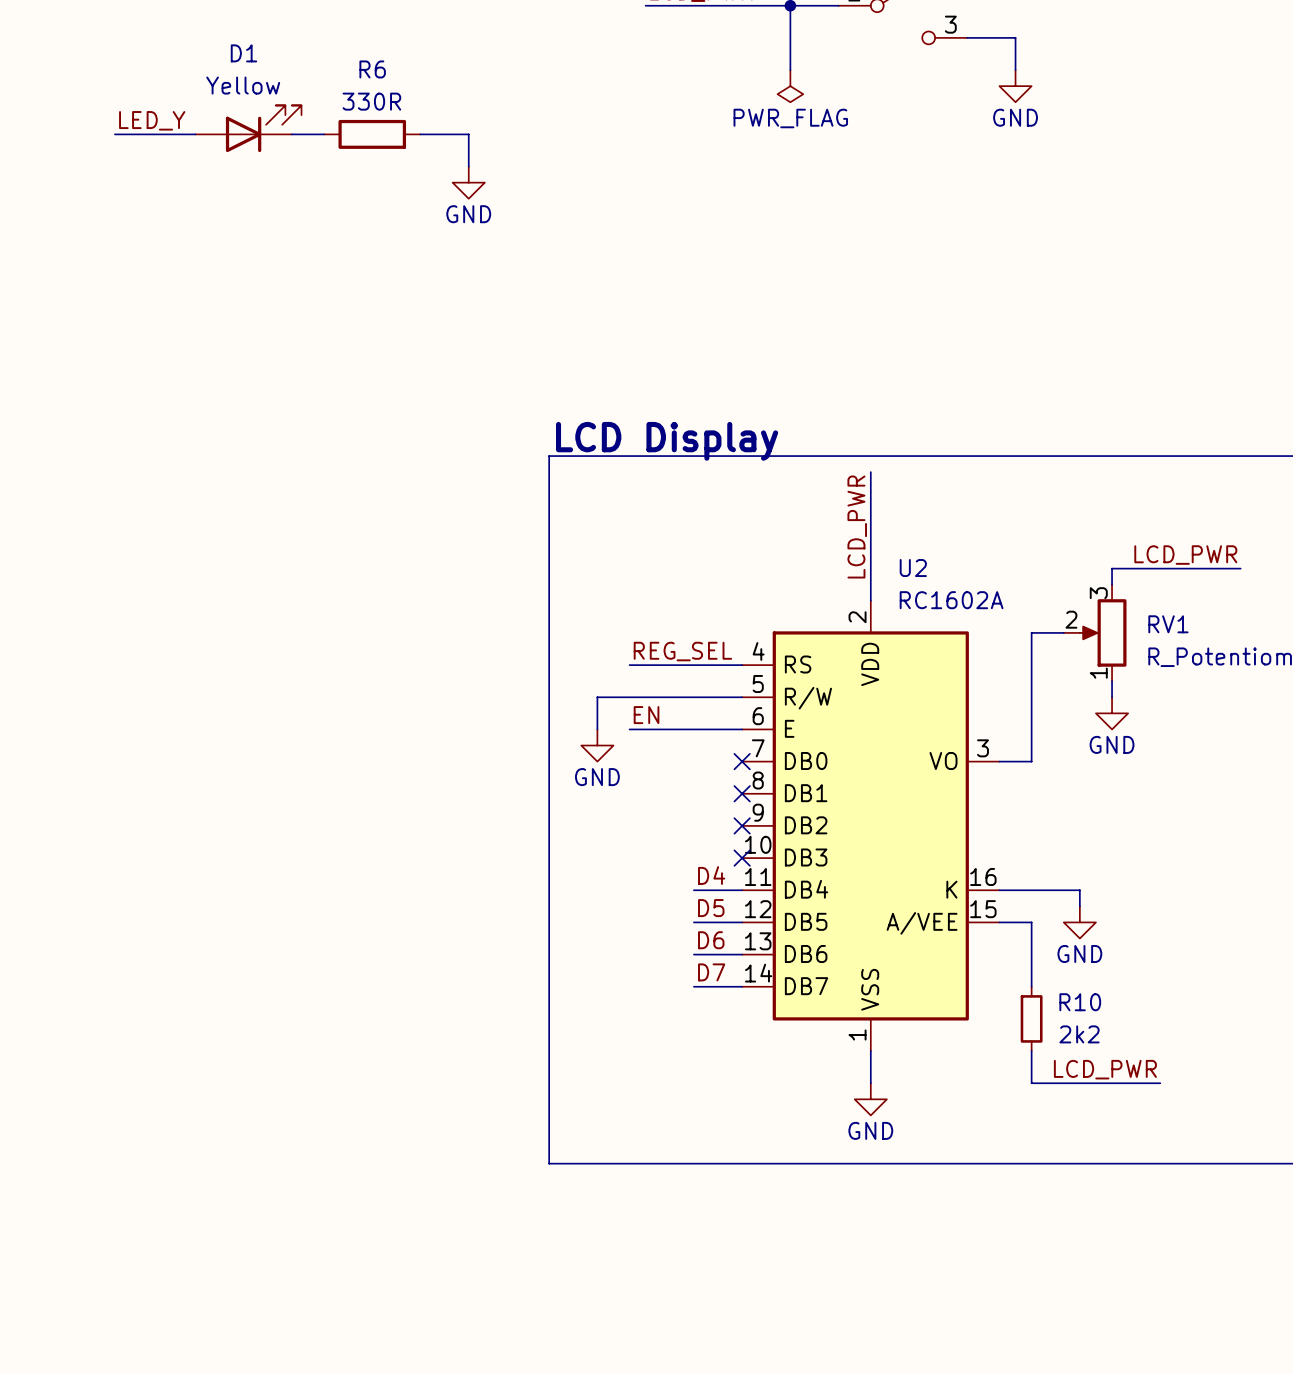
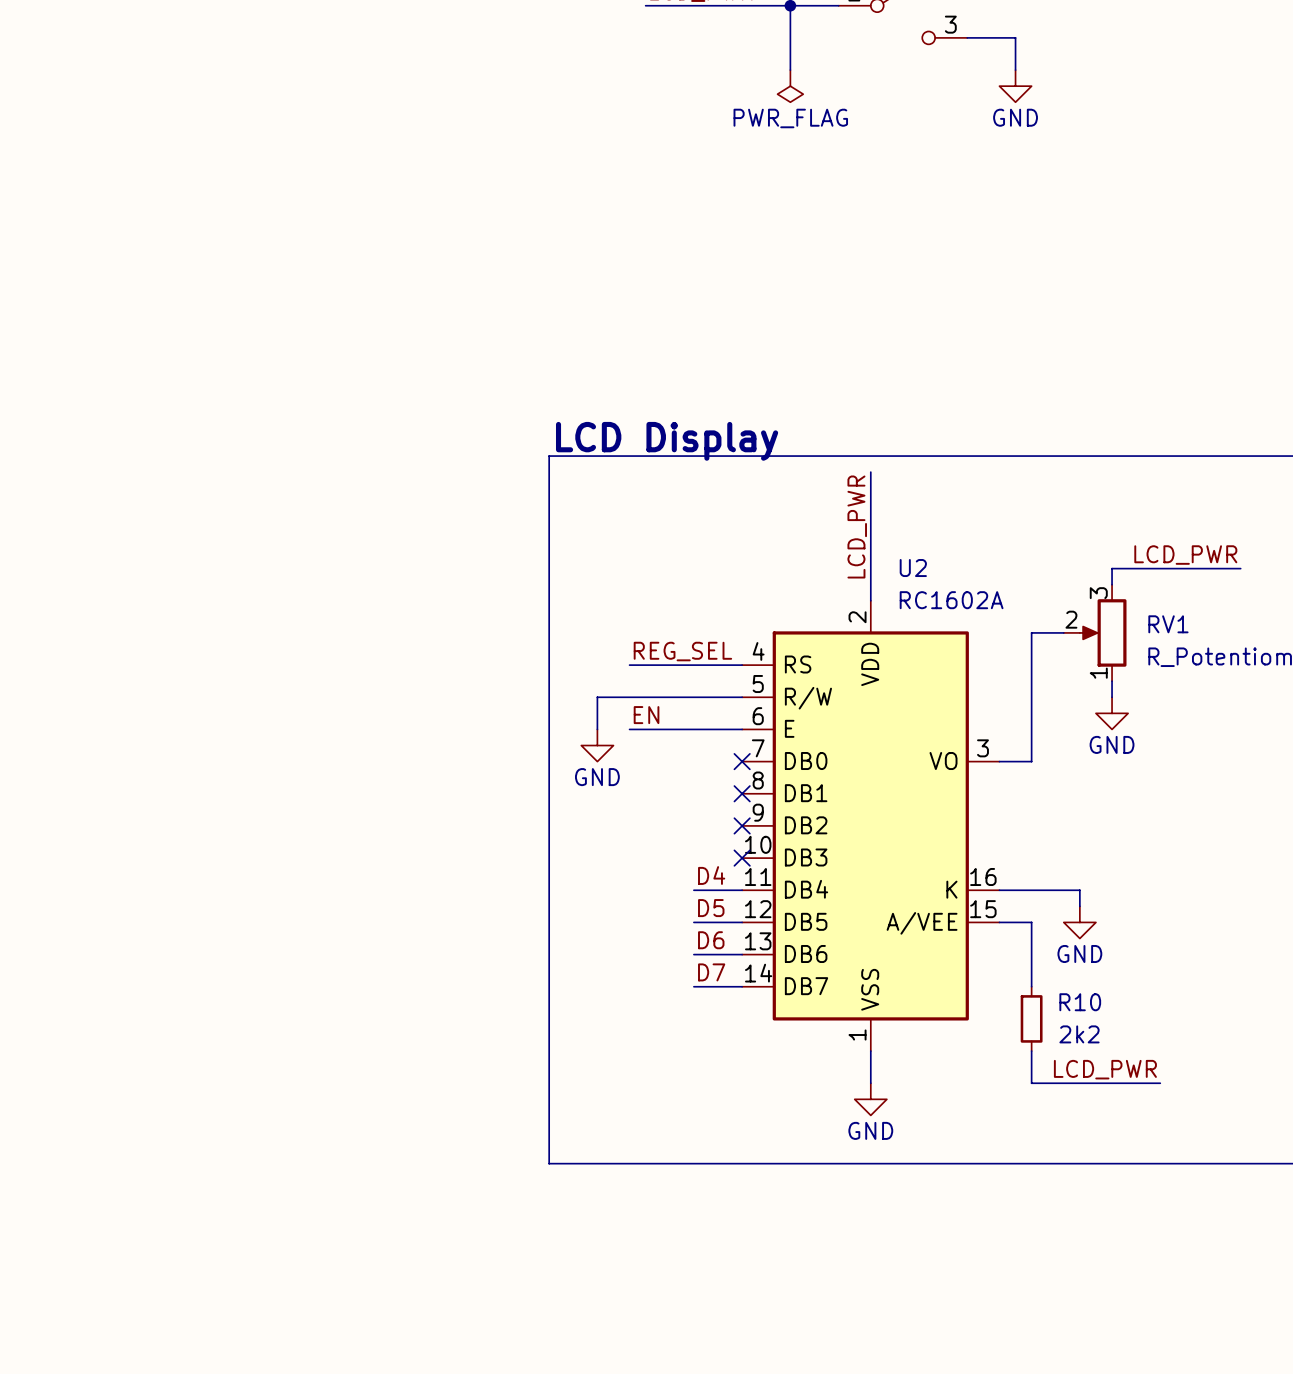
label: LED_Y (152, 120) -> none
D1: Yellow (248, 128) -> none
wire: (114, 134) (195, 134) -> none
wire: (291, 134) (324, 134) -> none
R6: 330R (372, 134) -> none
wire: (420, 134) (468, 134) (468, 166) -> none
power symbol: GND (468, 182) -> none

